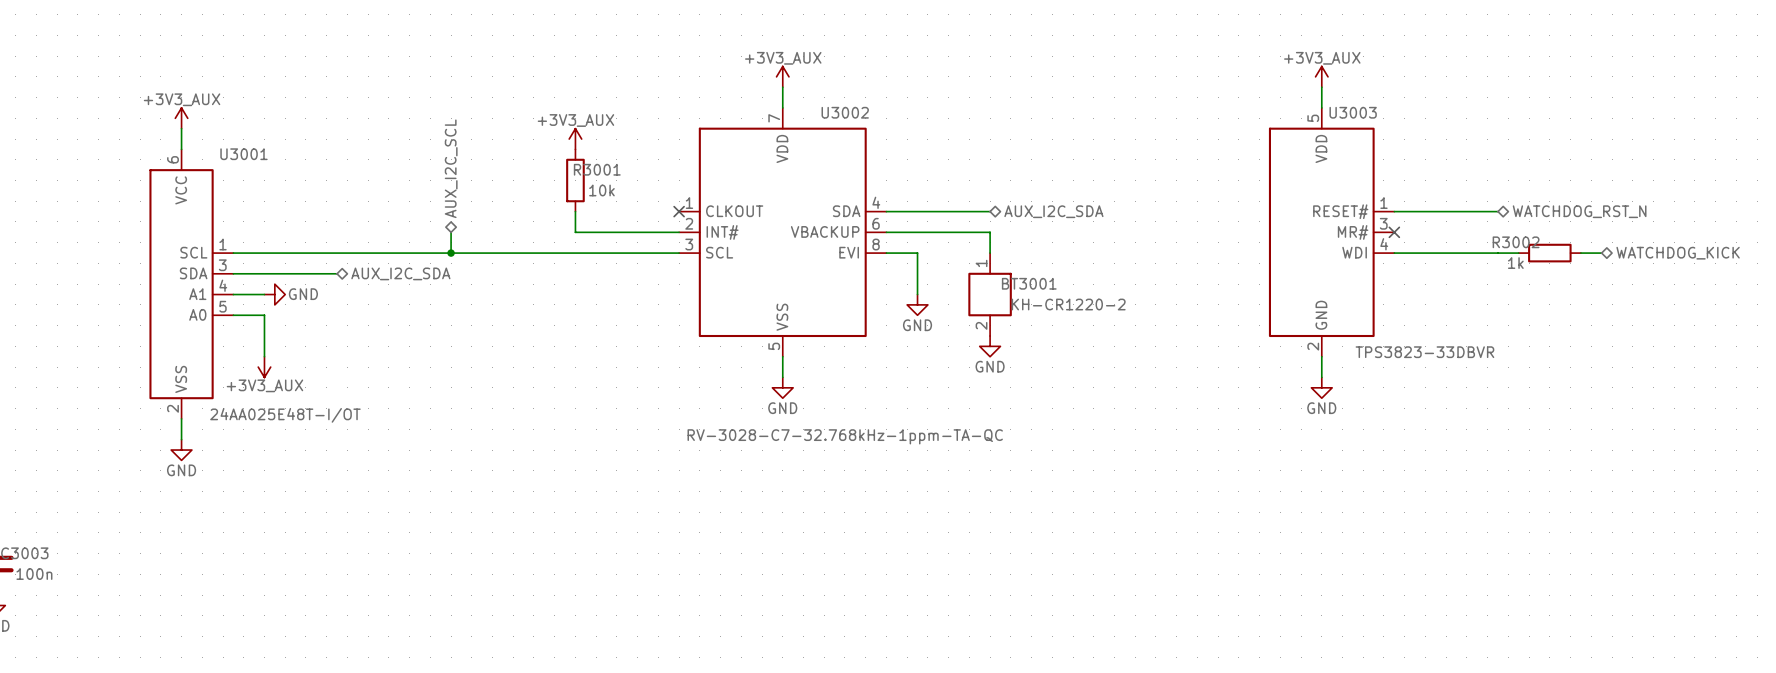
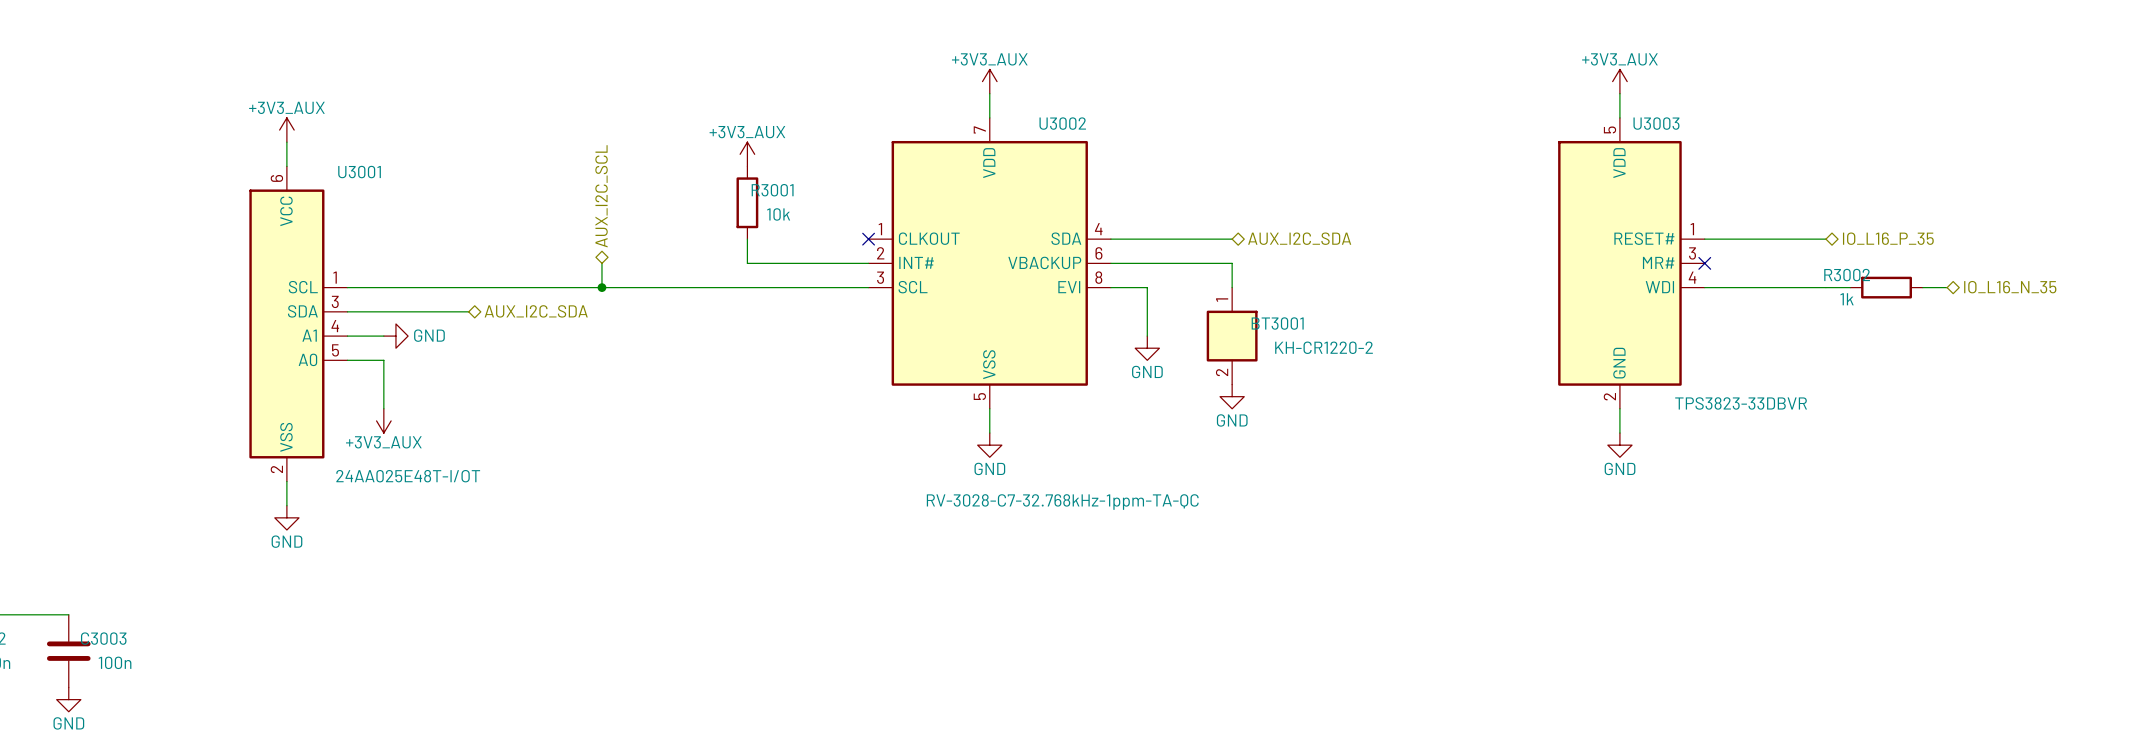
hierarchical label: WATCHDOG_RST_N (1579, 211) -> IO_L16_P_35 (1888, 238)
hierarchical label: WATCHDOG_KICK (1678, 253) -> IO_L16_N_35 (2010, 287)

